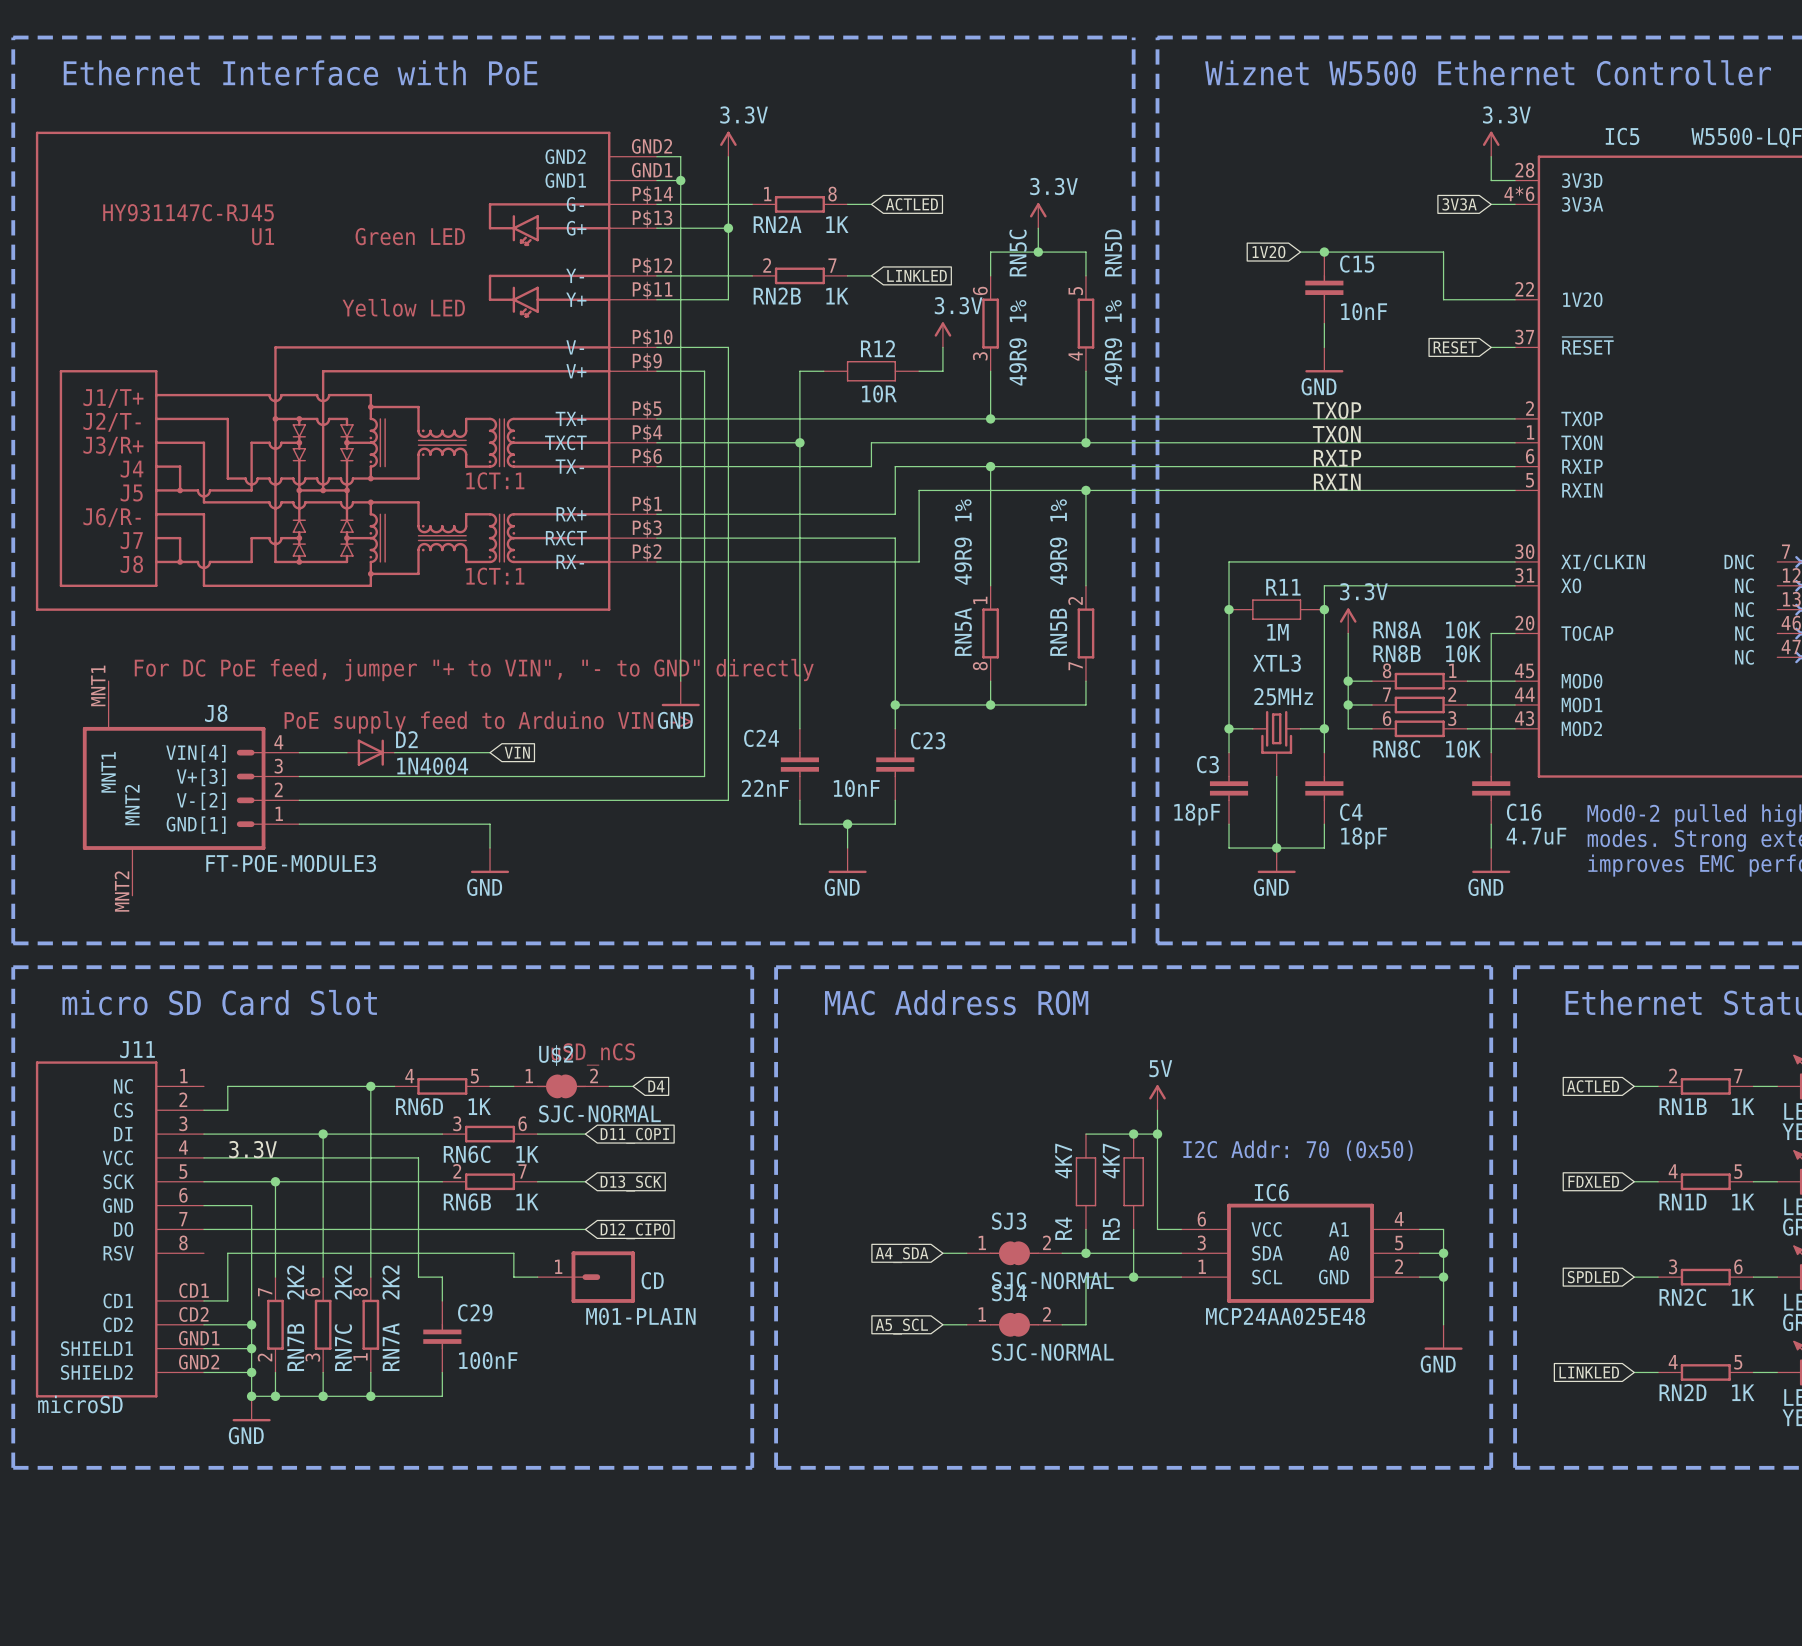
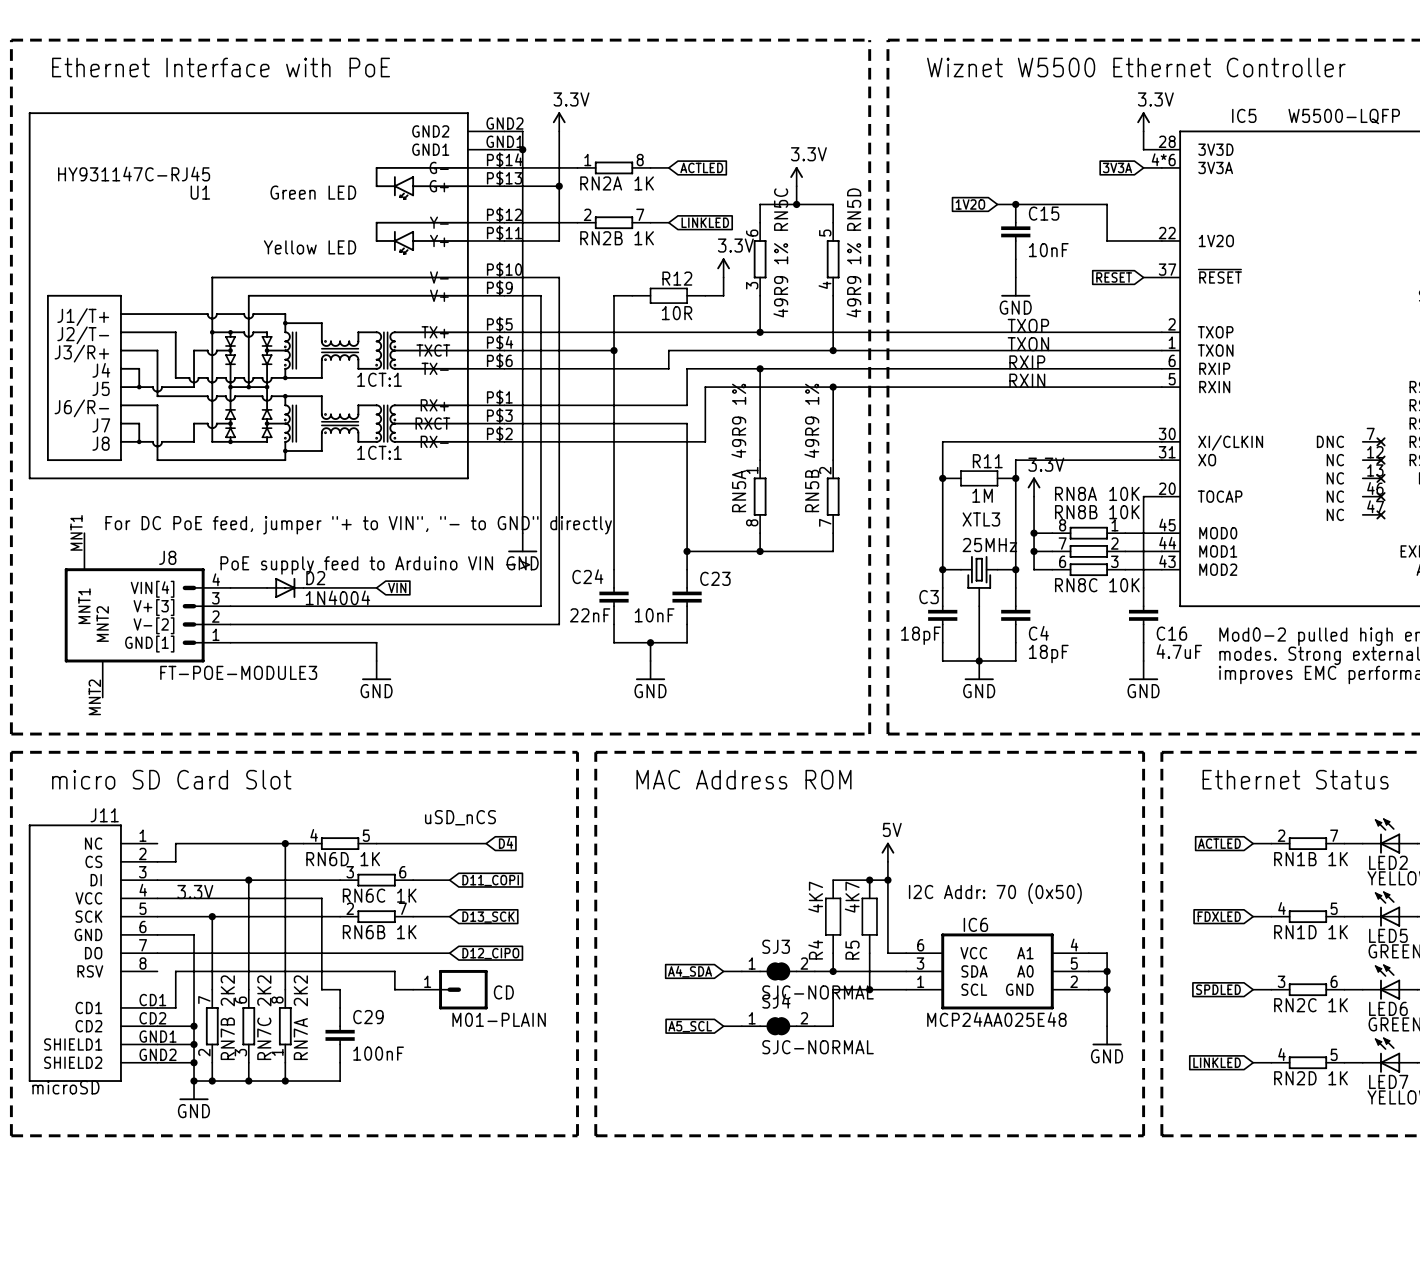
U$2: SJC-NORMAL (561, 1086) -> none

